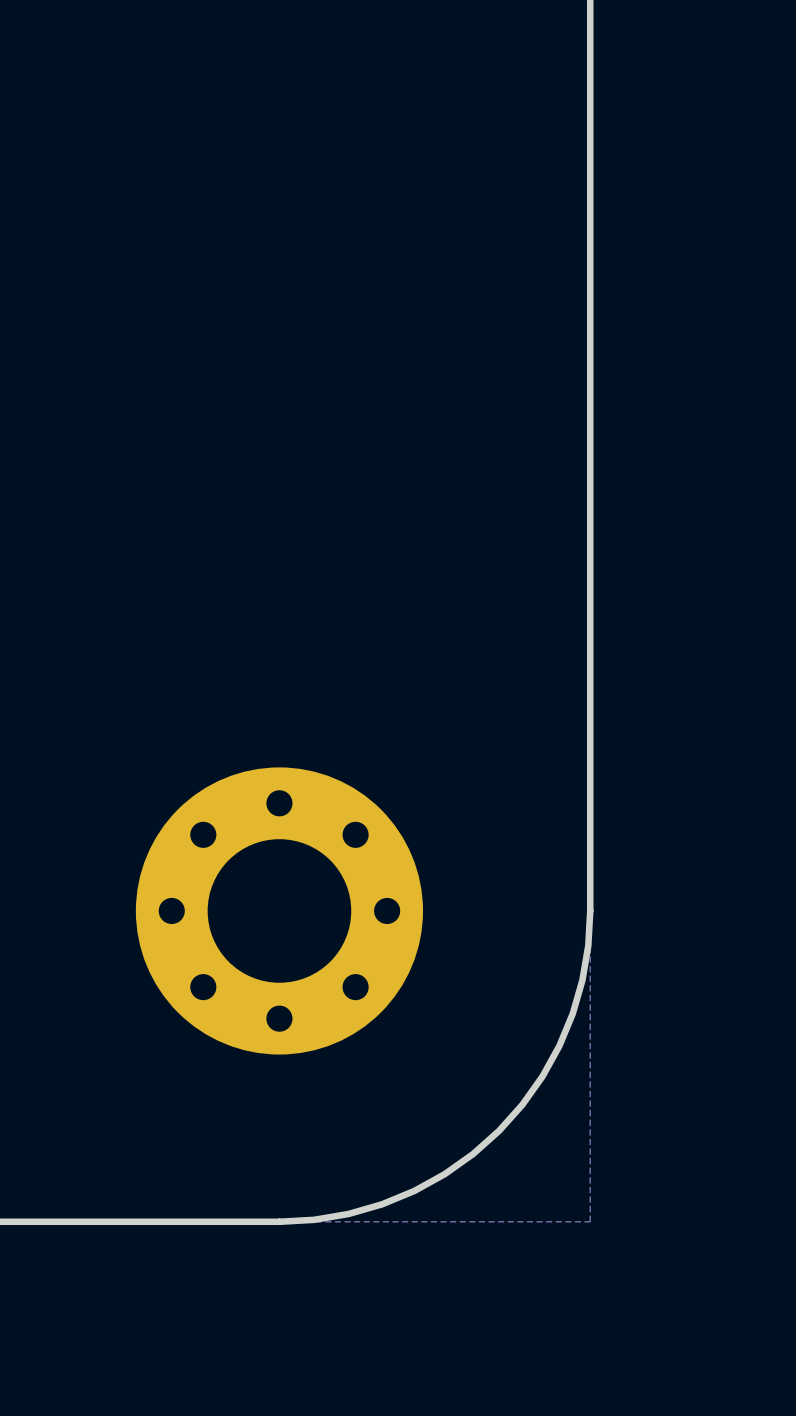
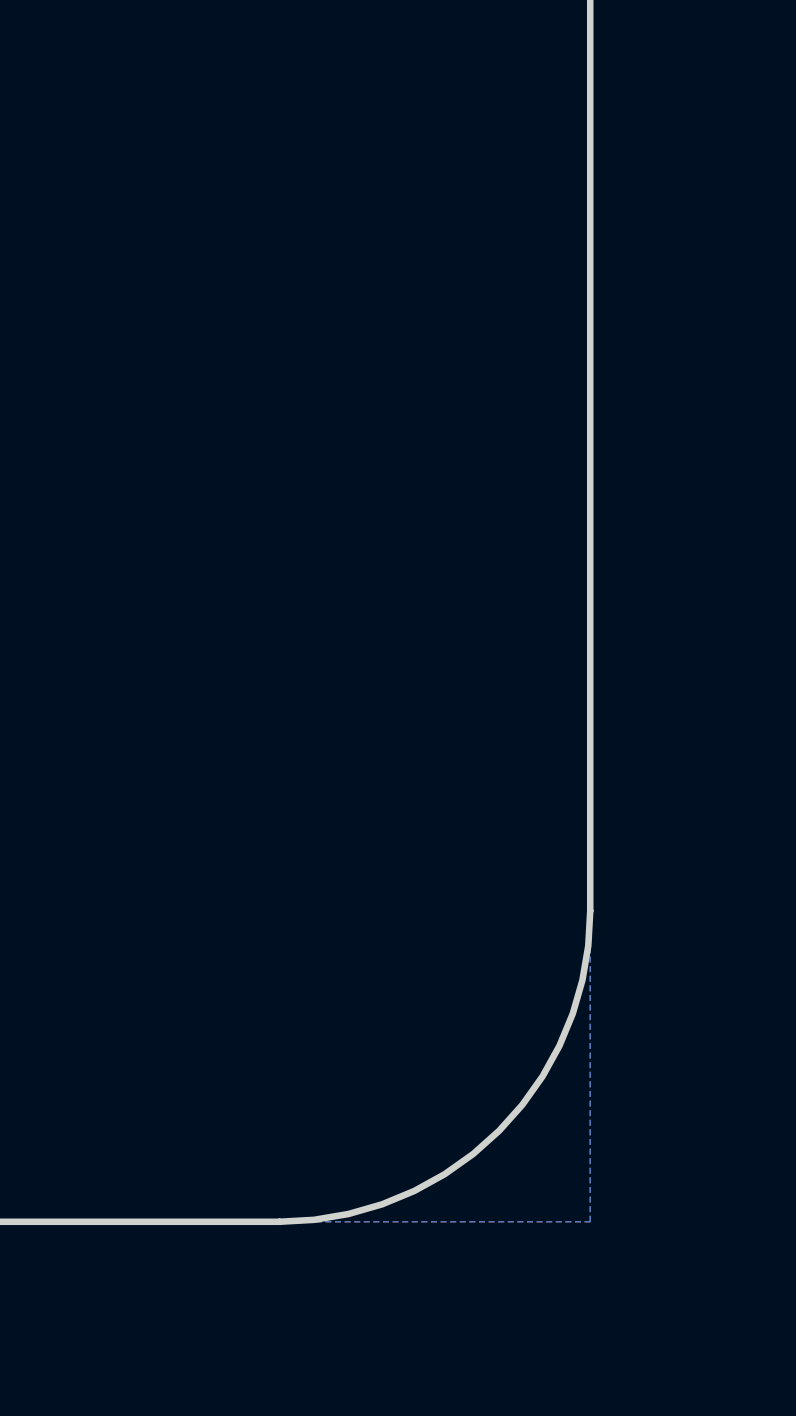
part: (279, 910) -> none

